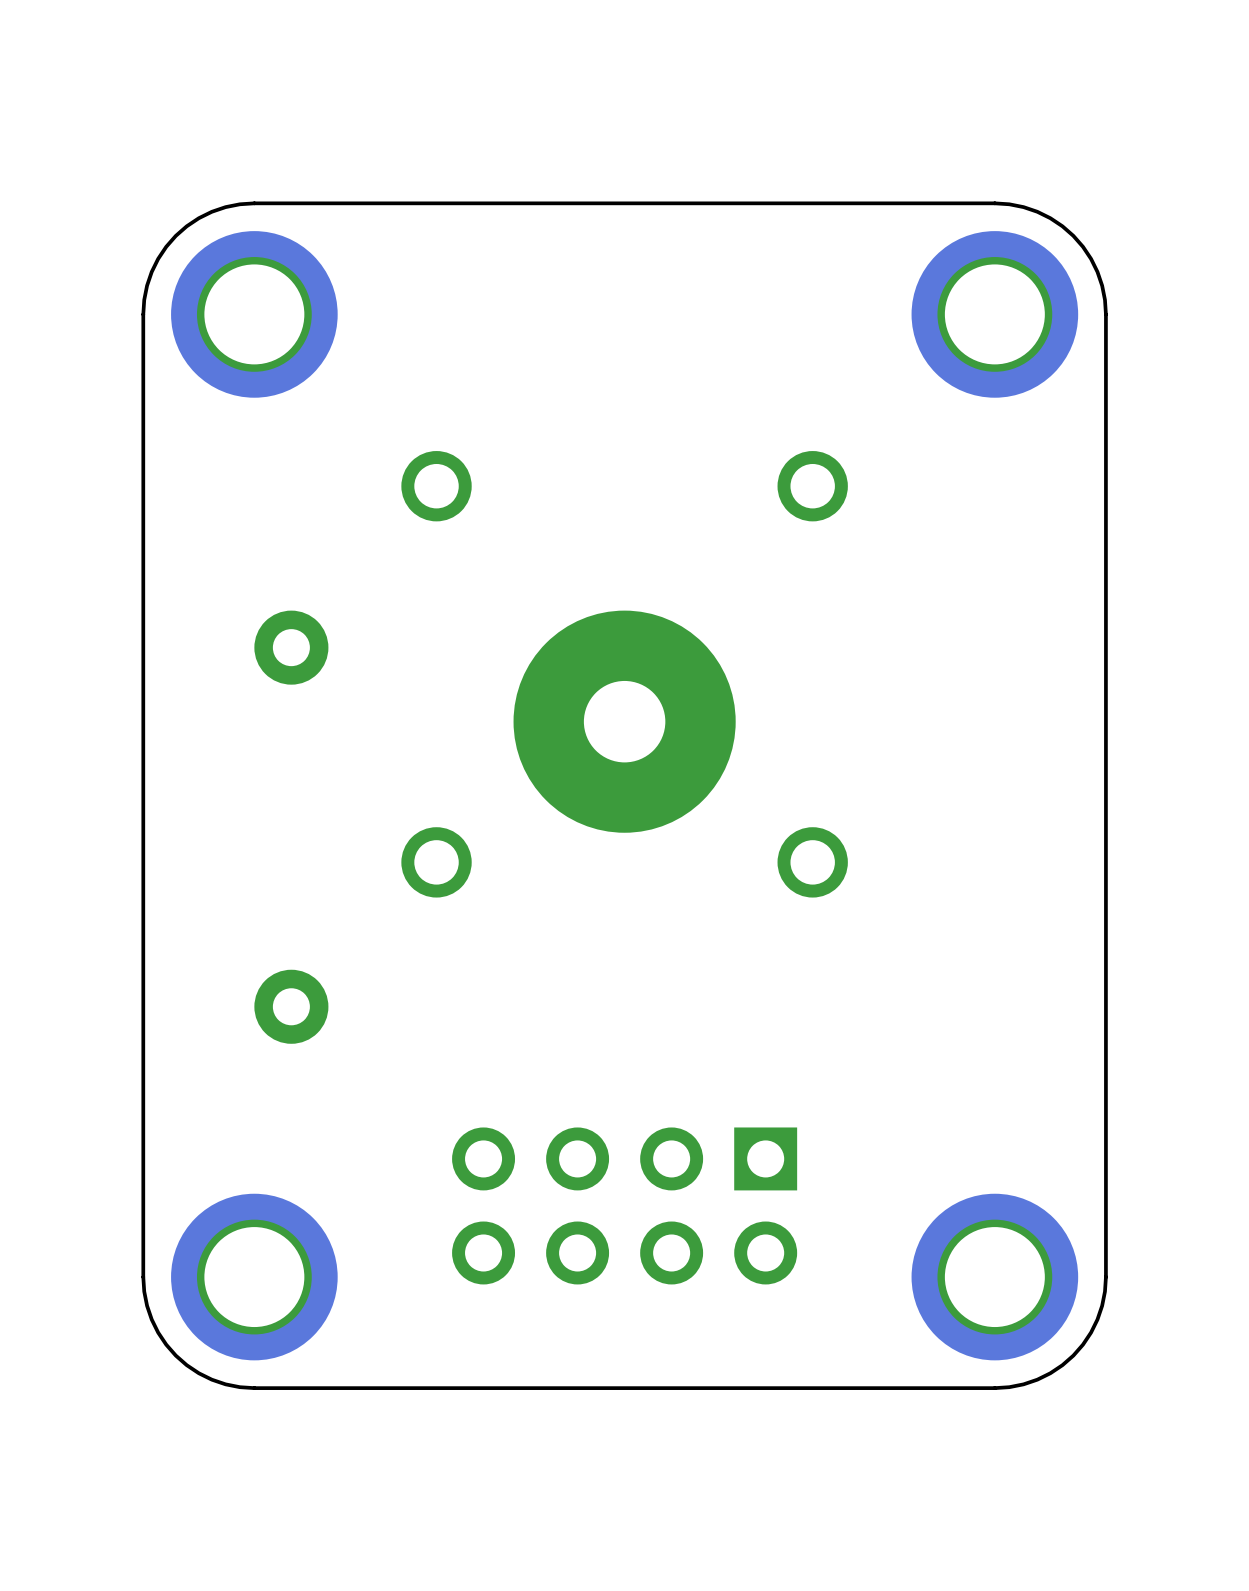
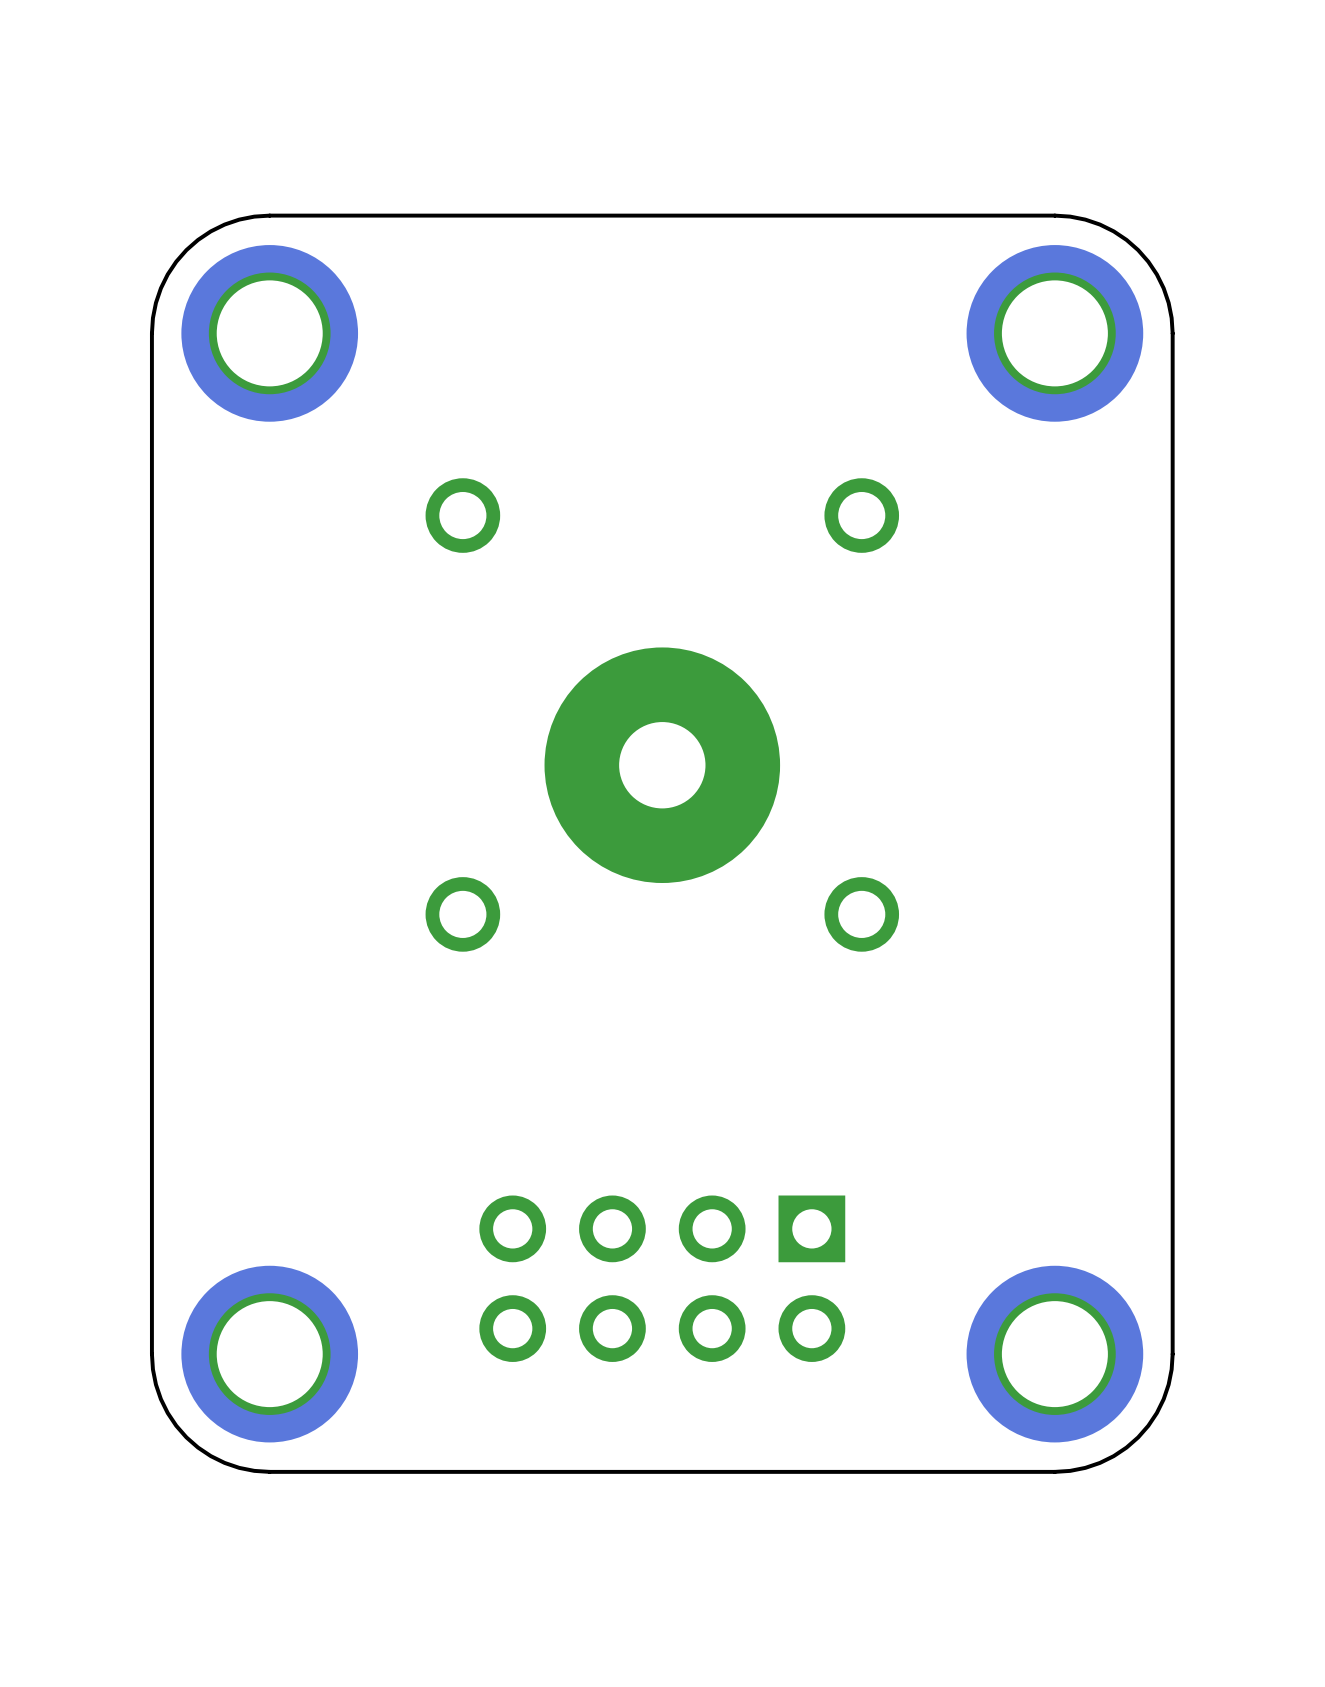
part: (291, 647) -> none
part: (291, 1006) -> none

